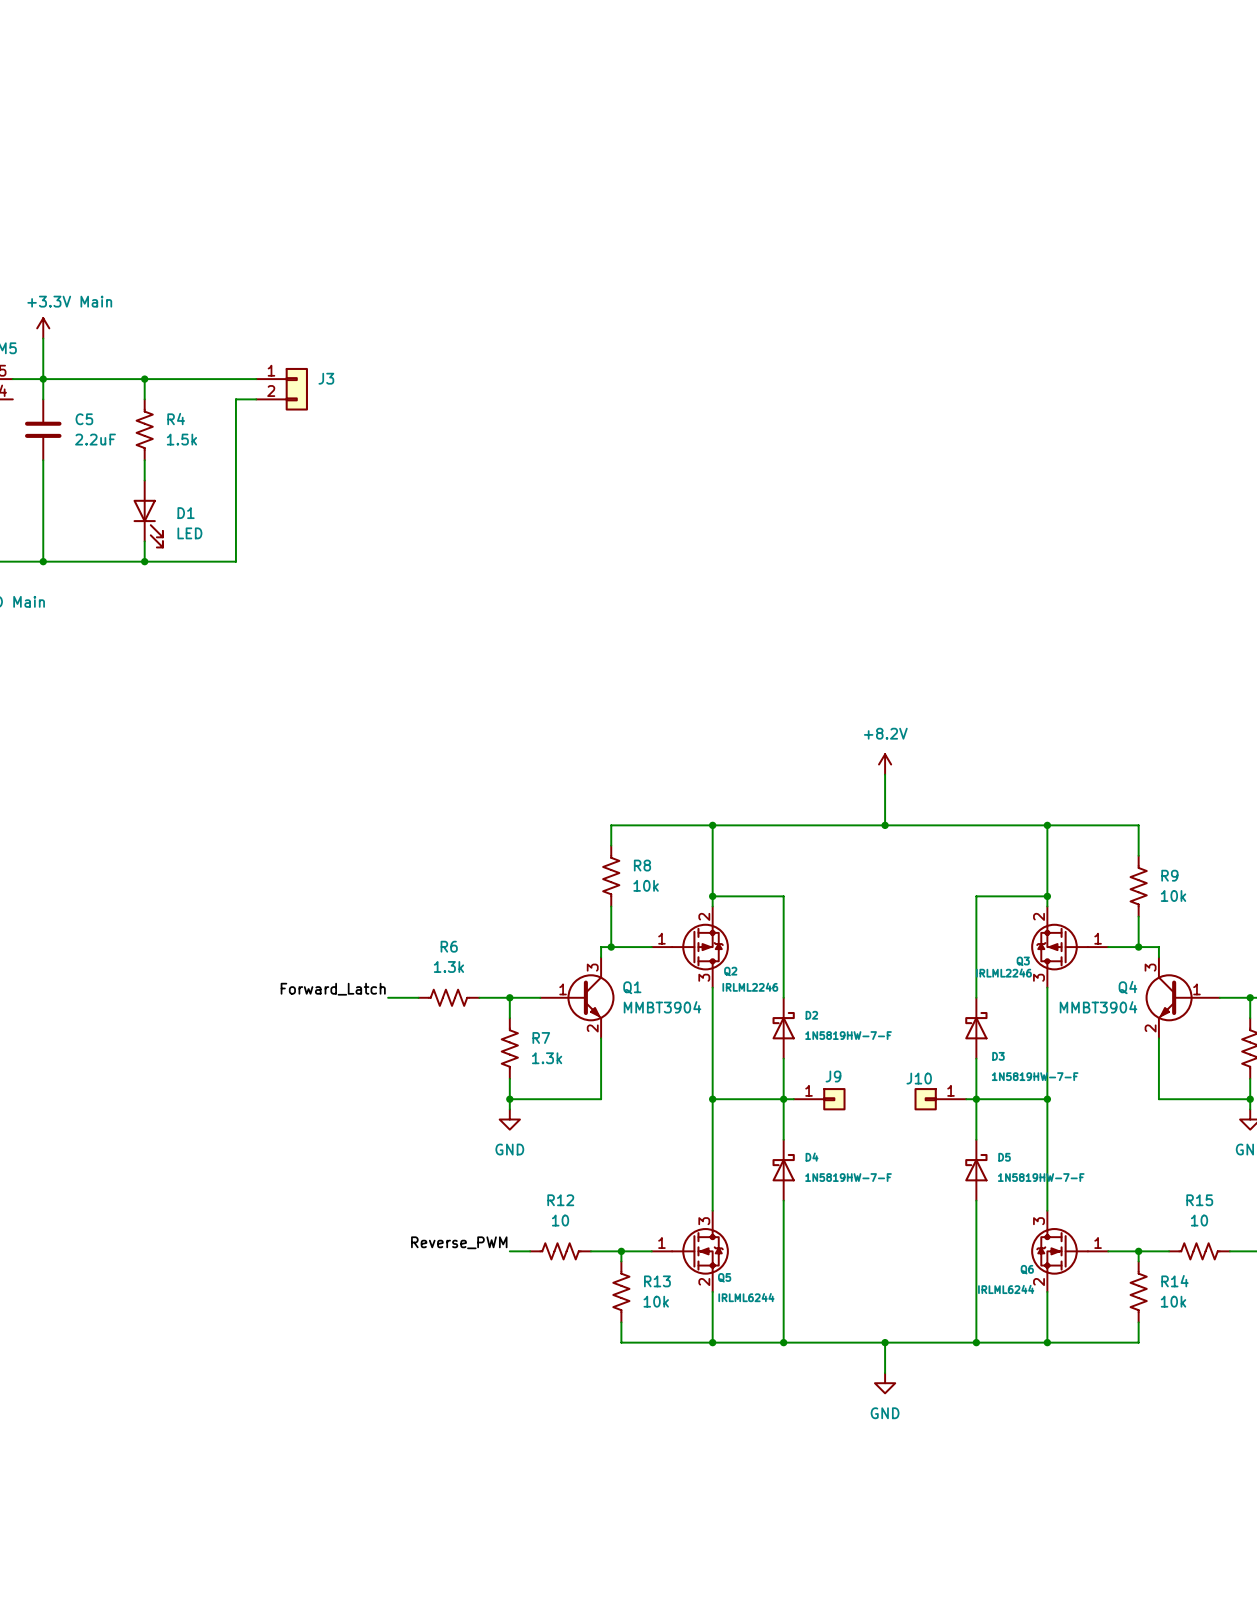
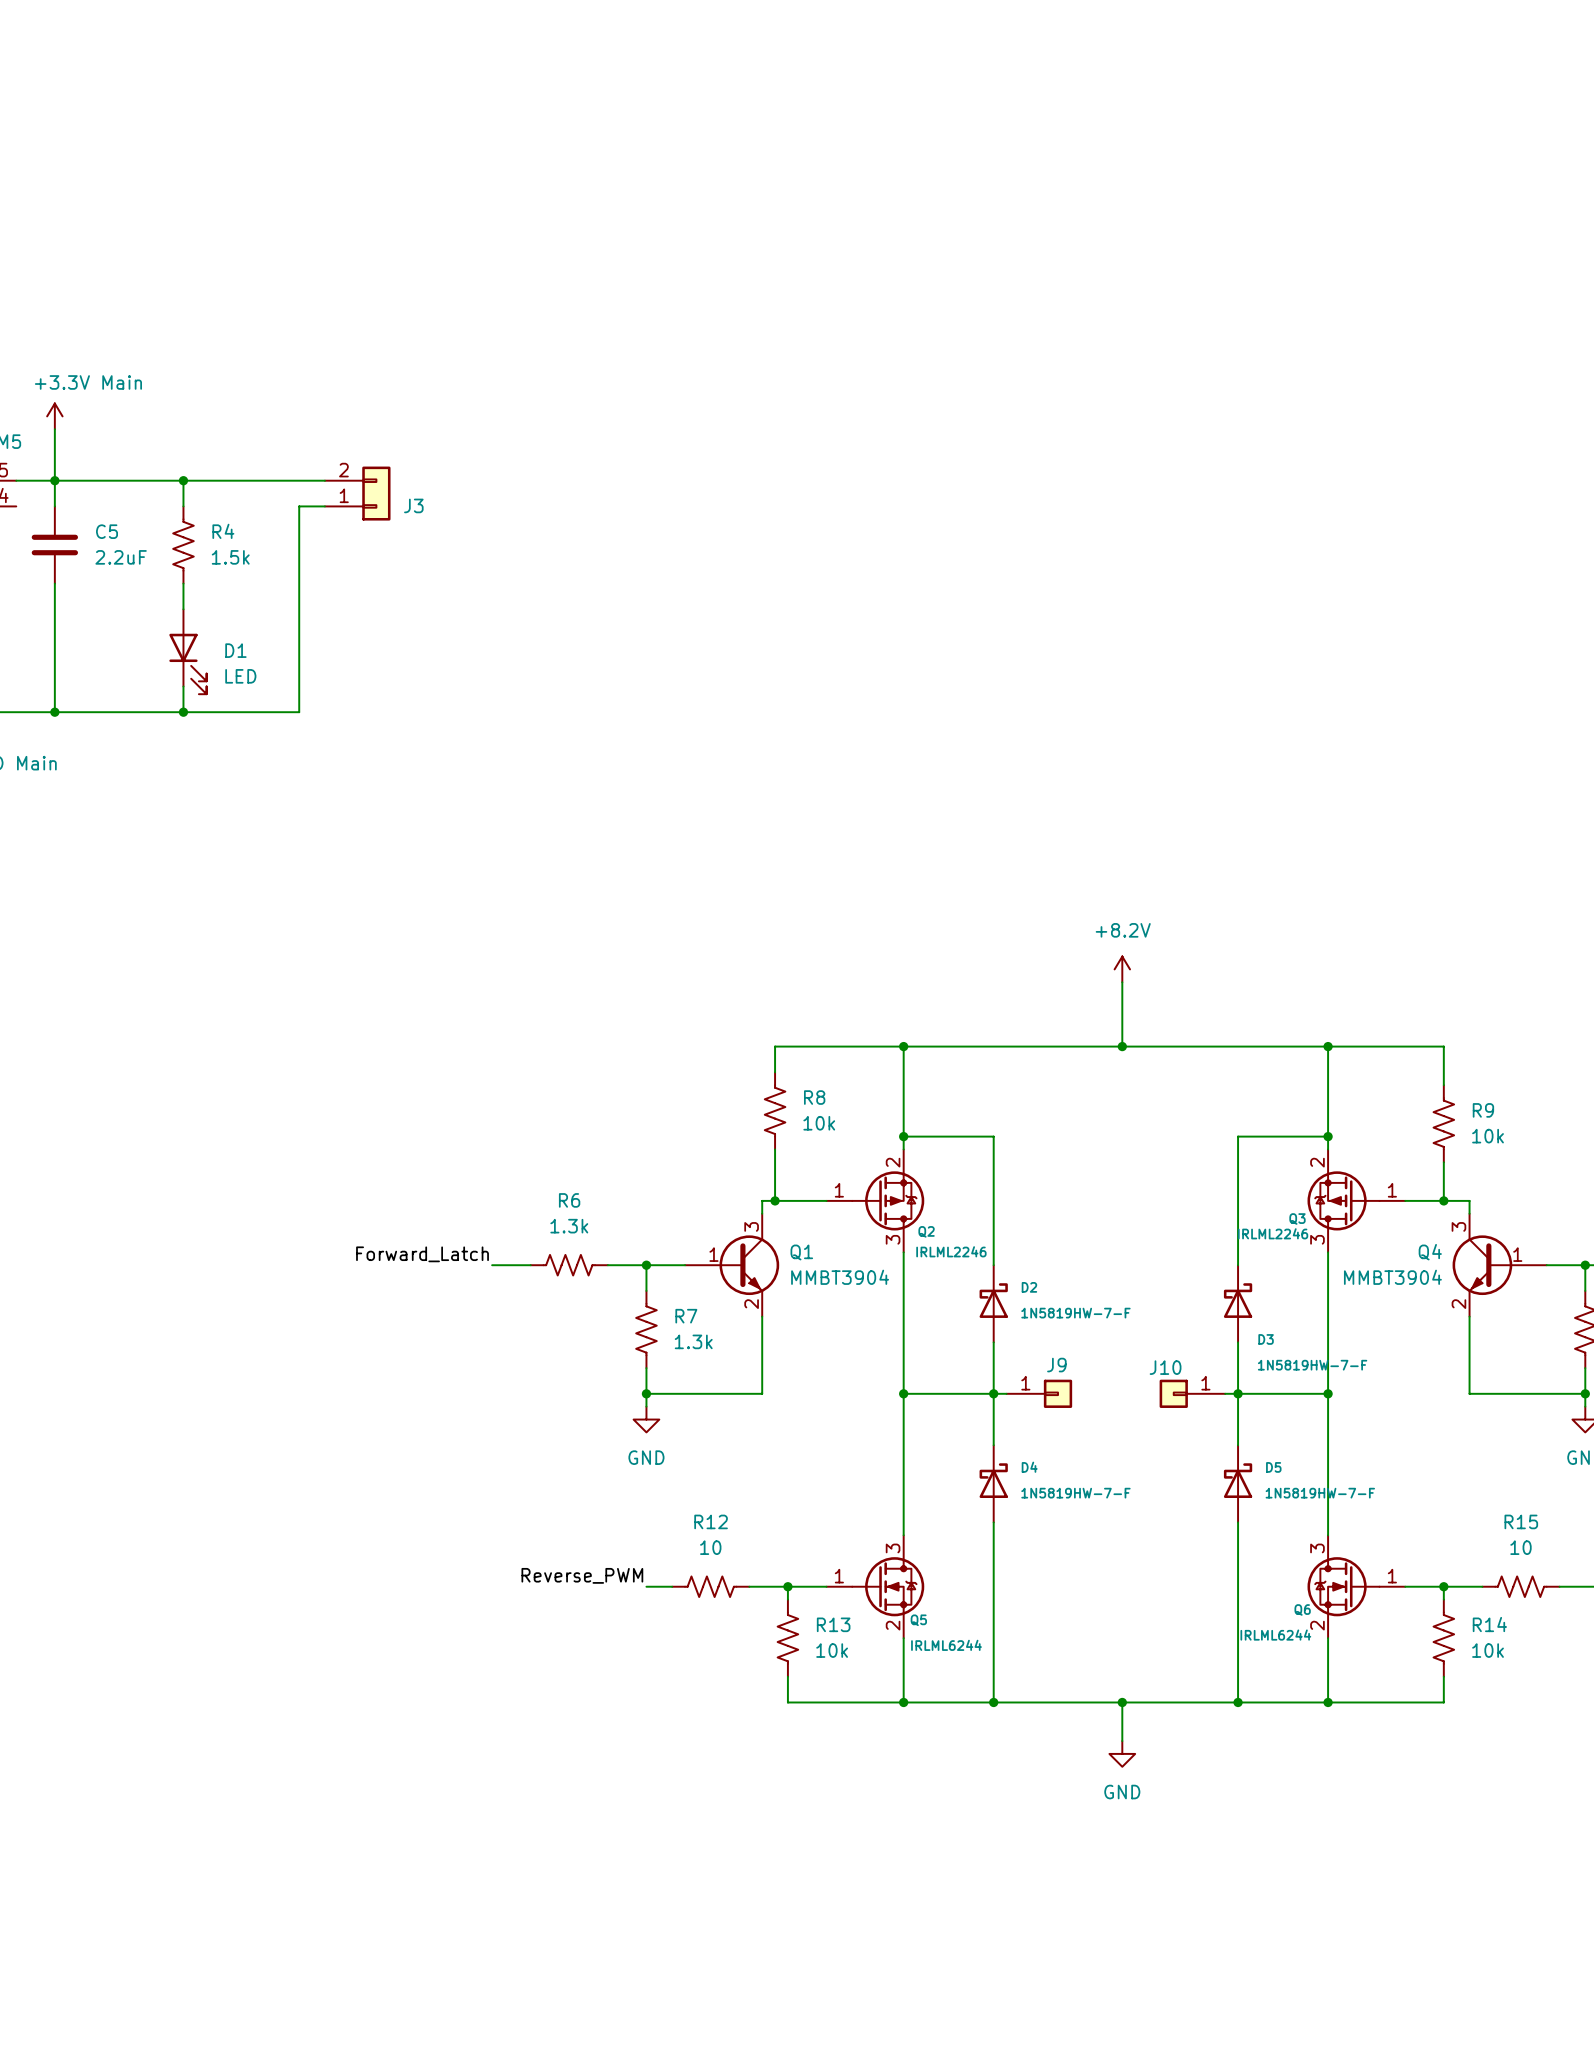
J3 flip: as is (296, 389) -> up-down (376, 493)

